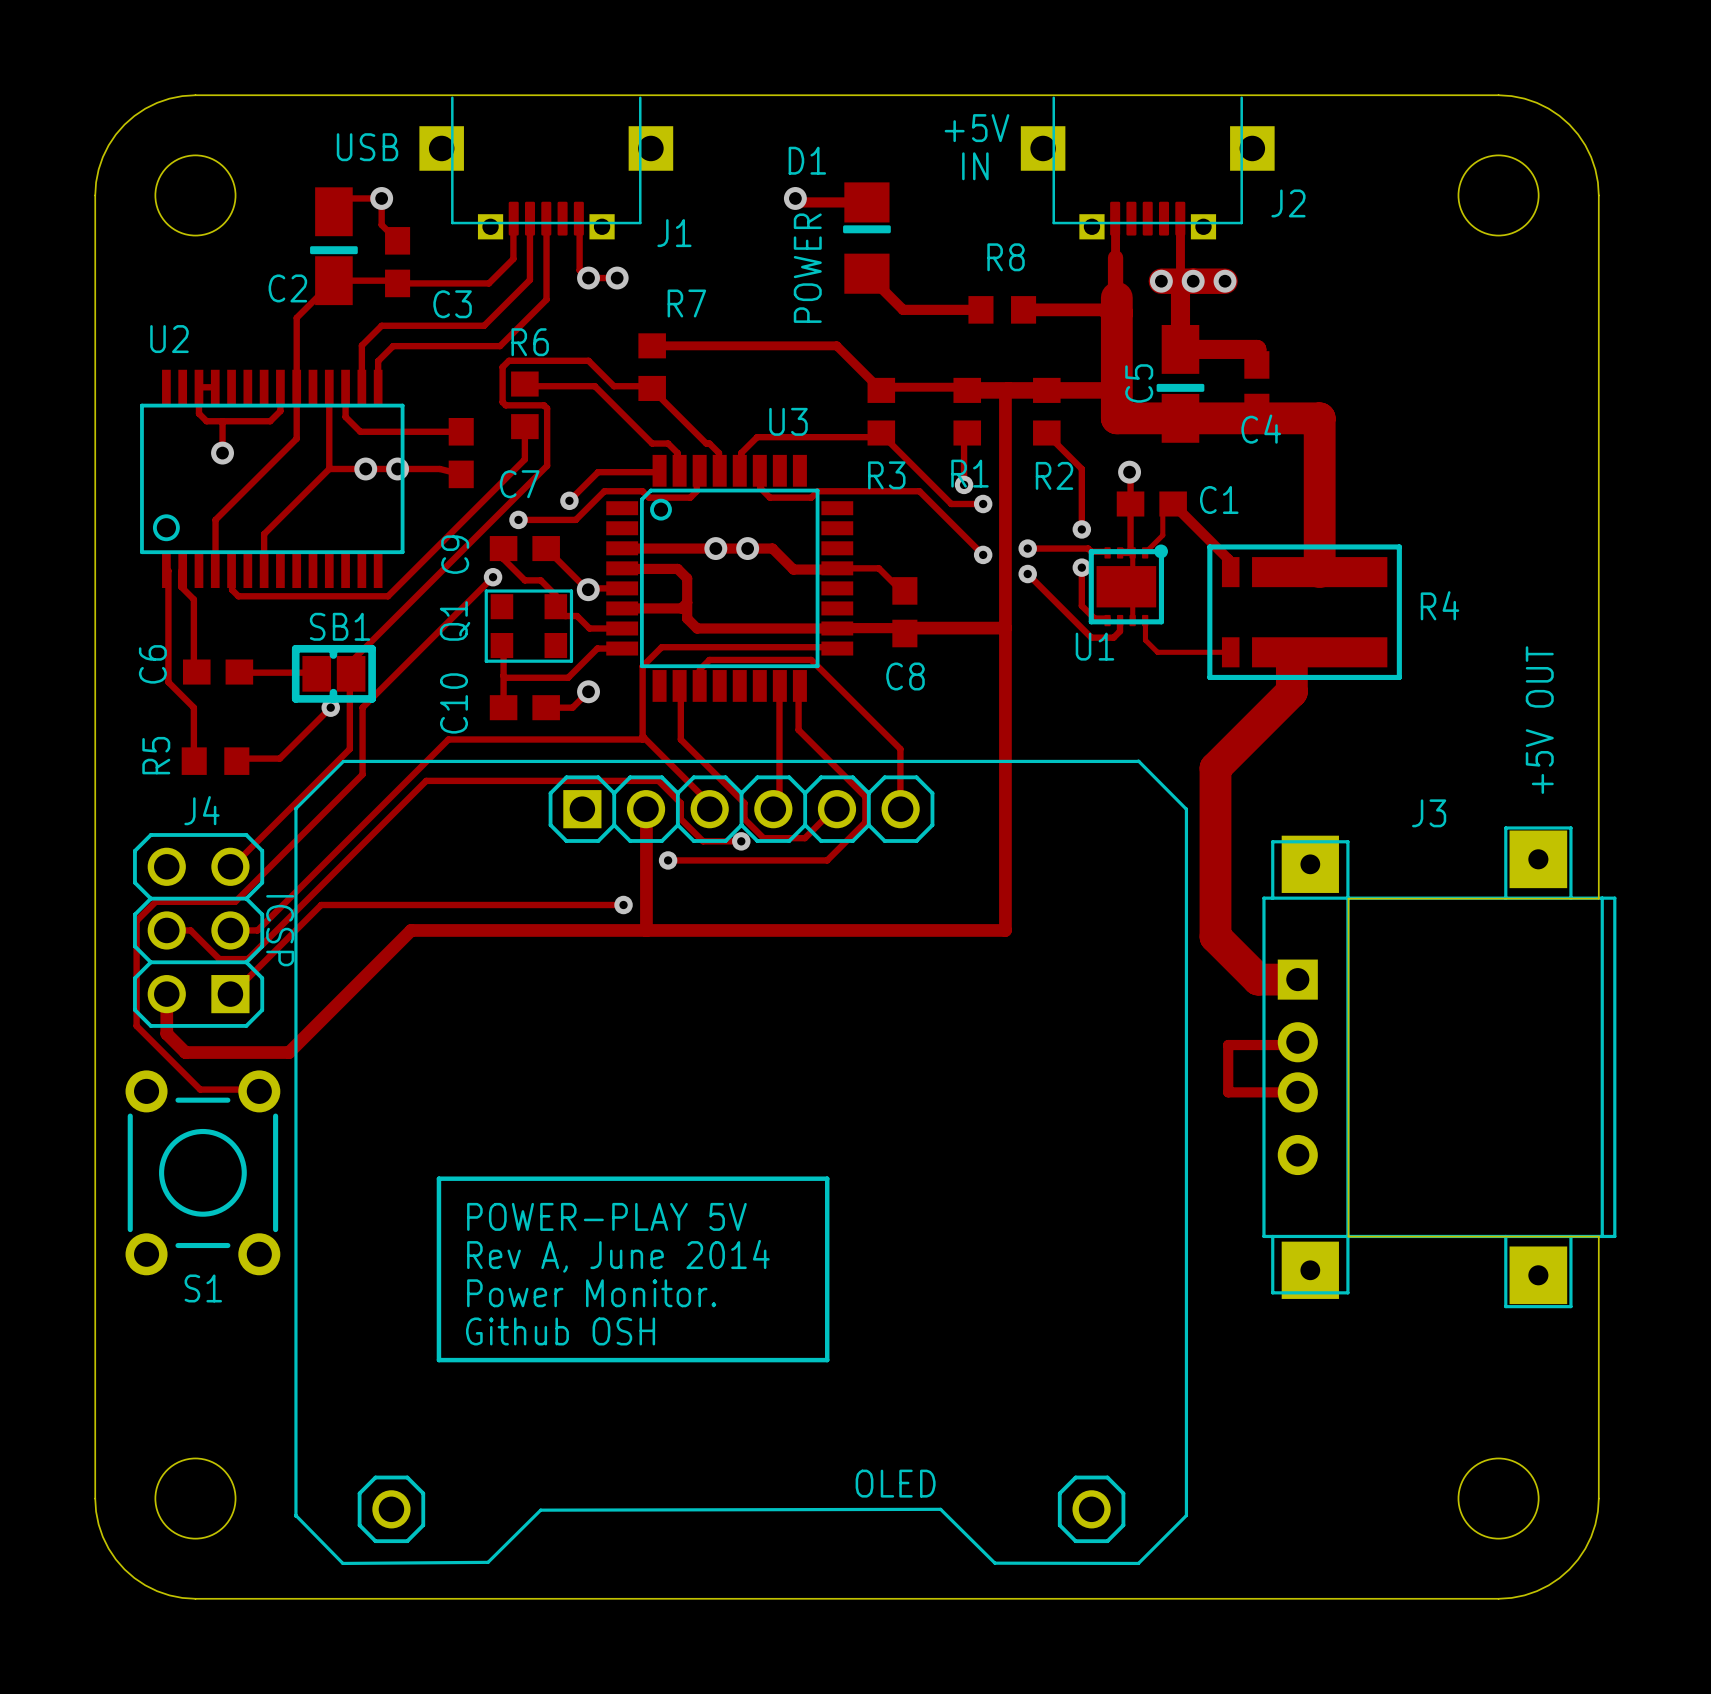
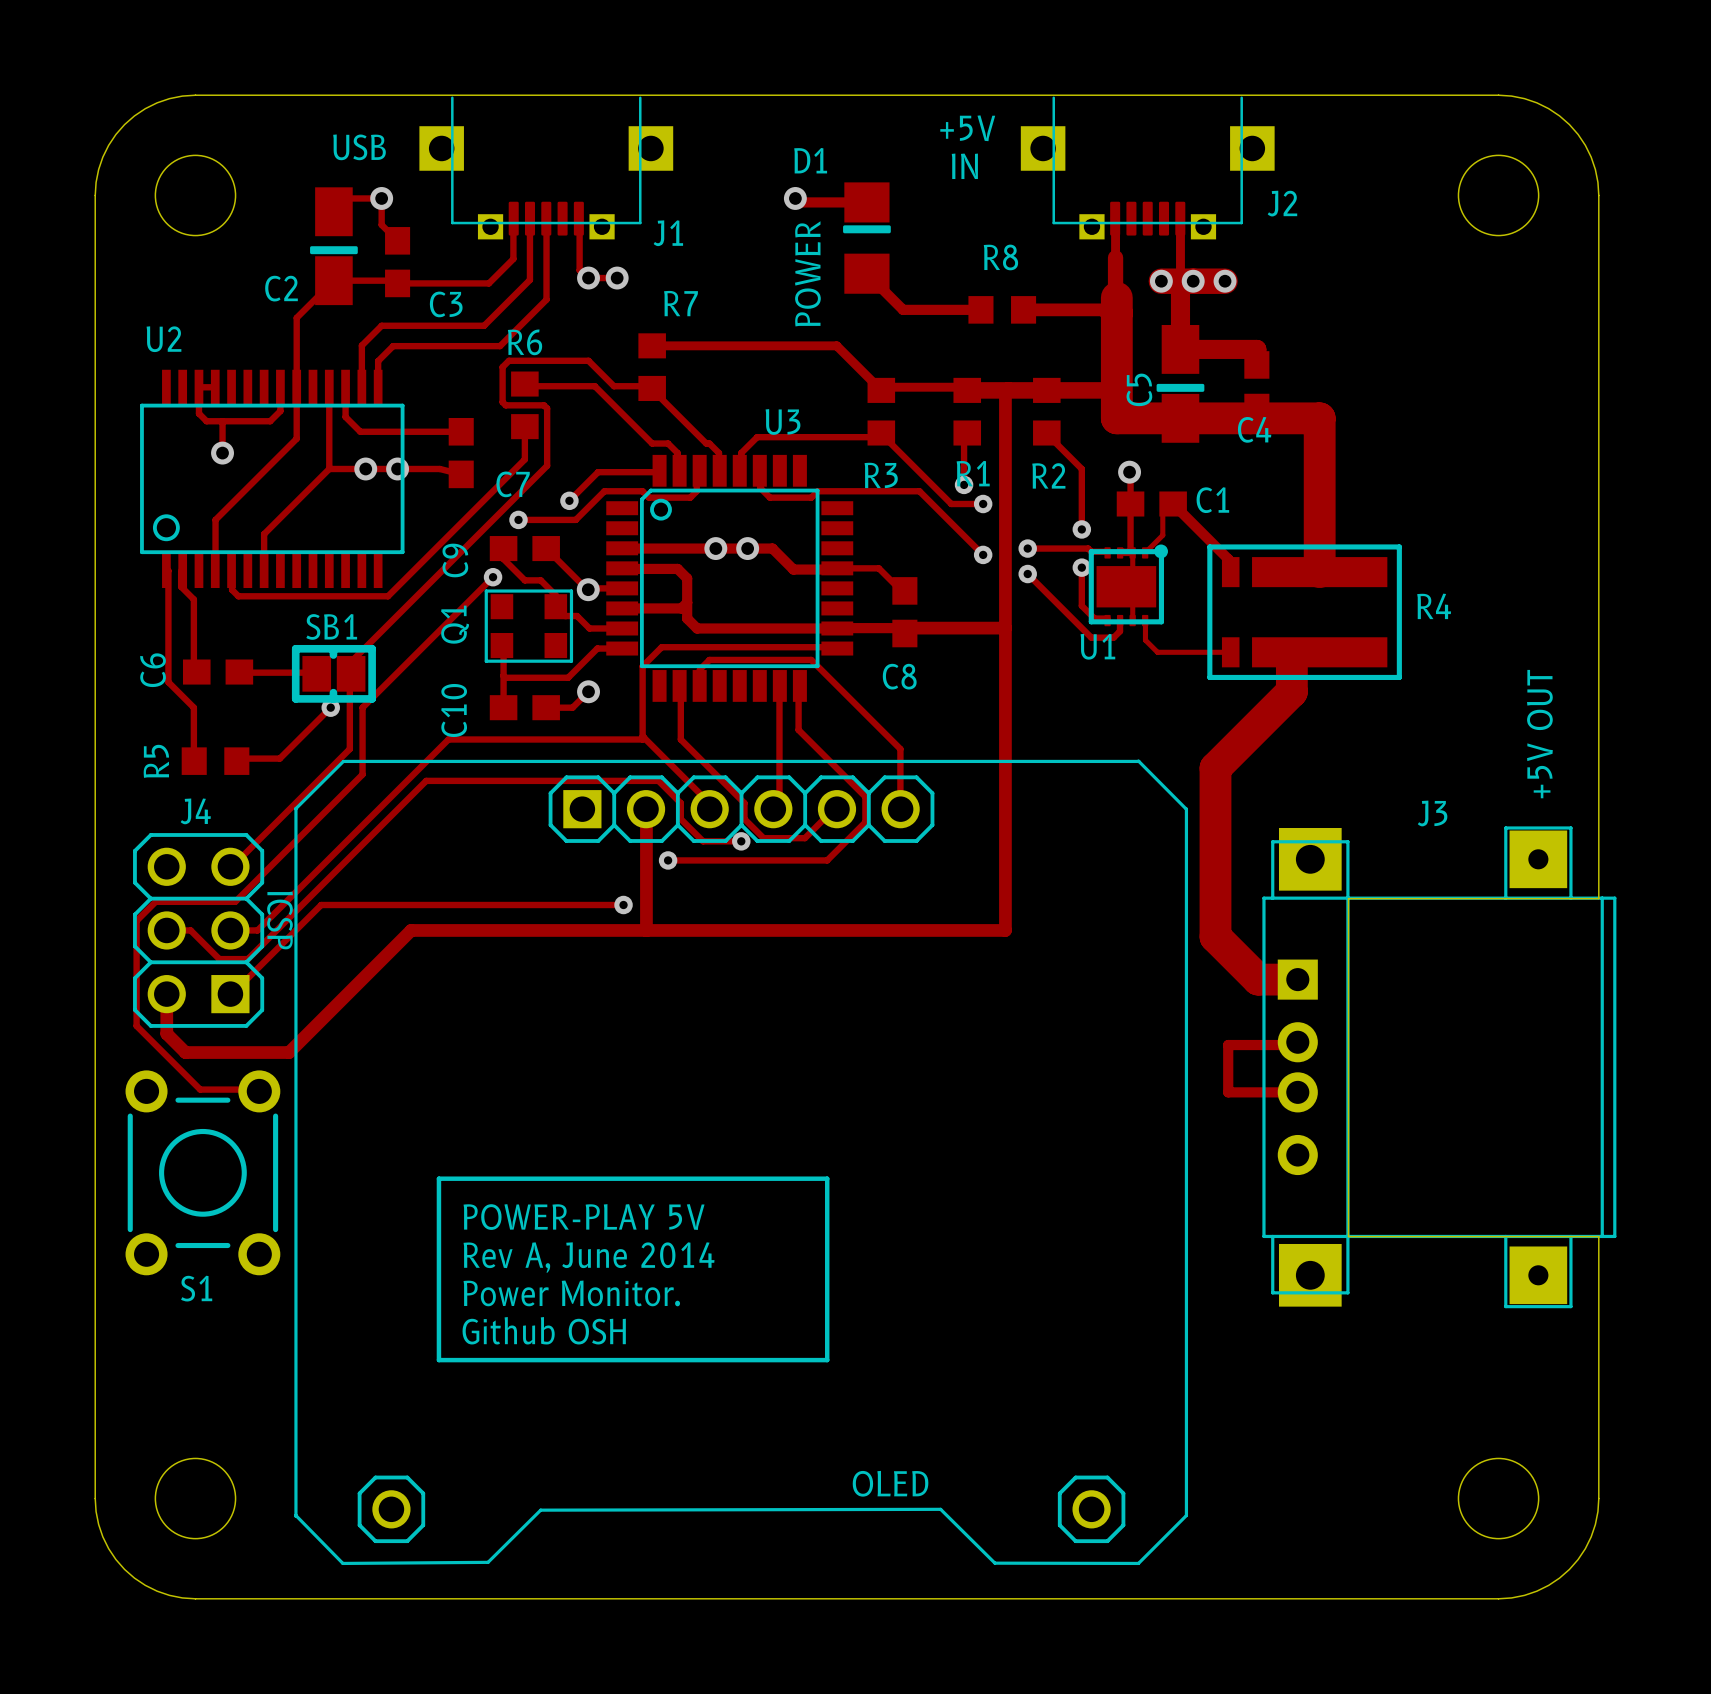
J3 footprint: [1262, 826, 1617, 1309] -> [1262, 826, 1617, 1309]

